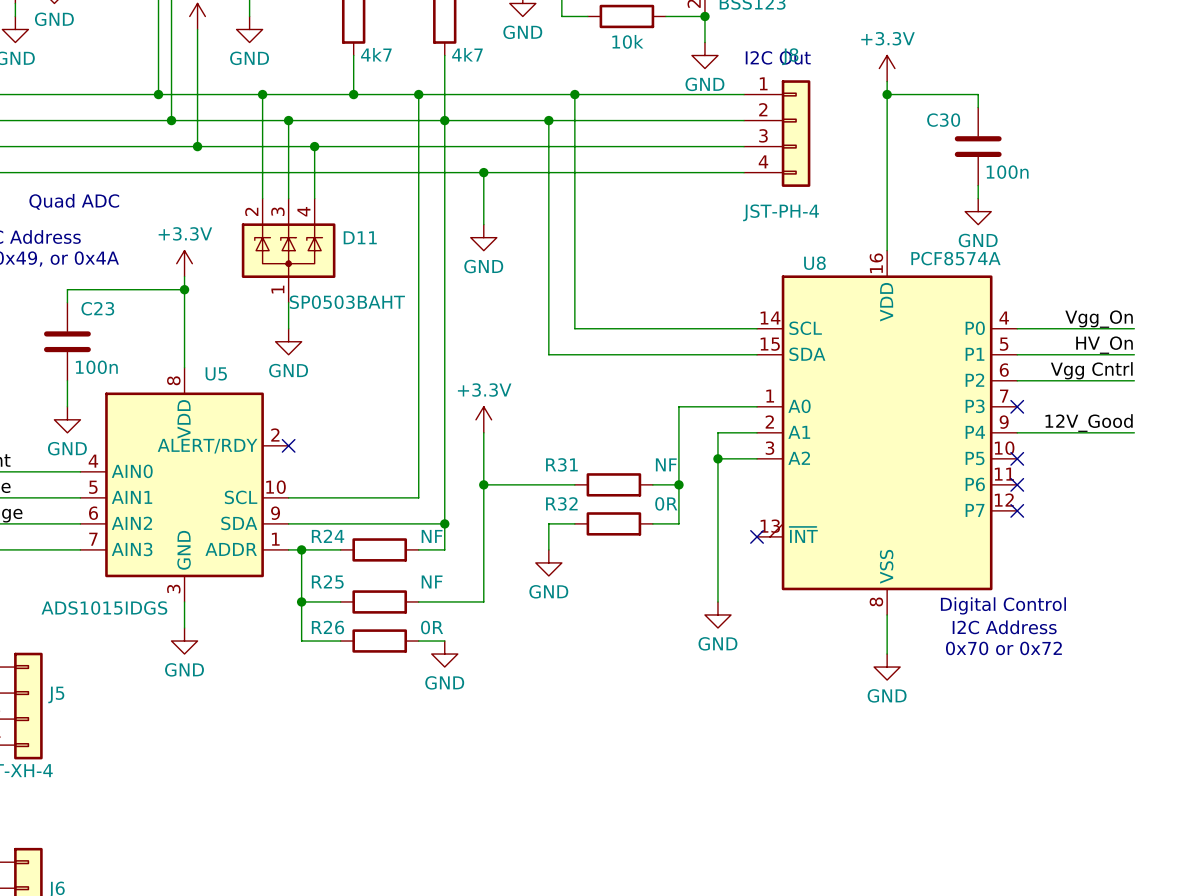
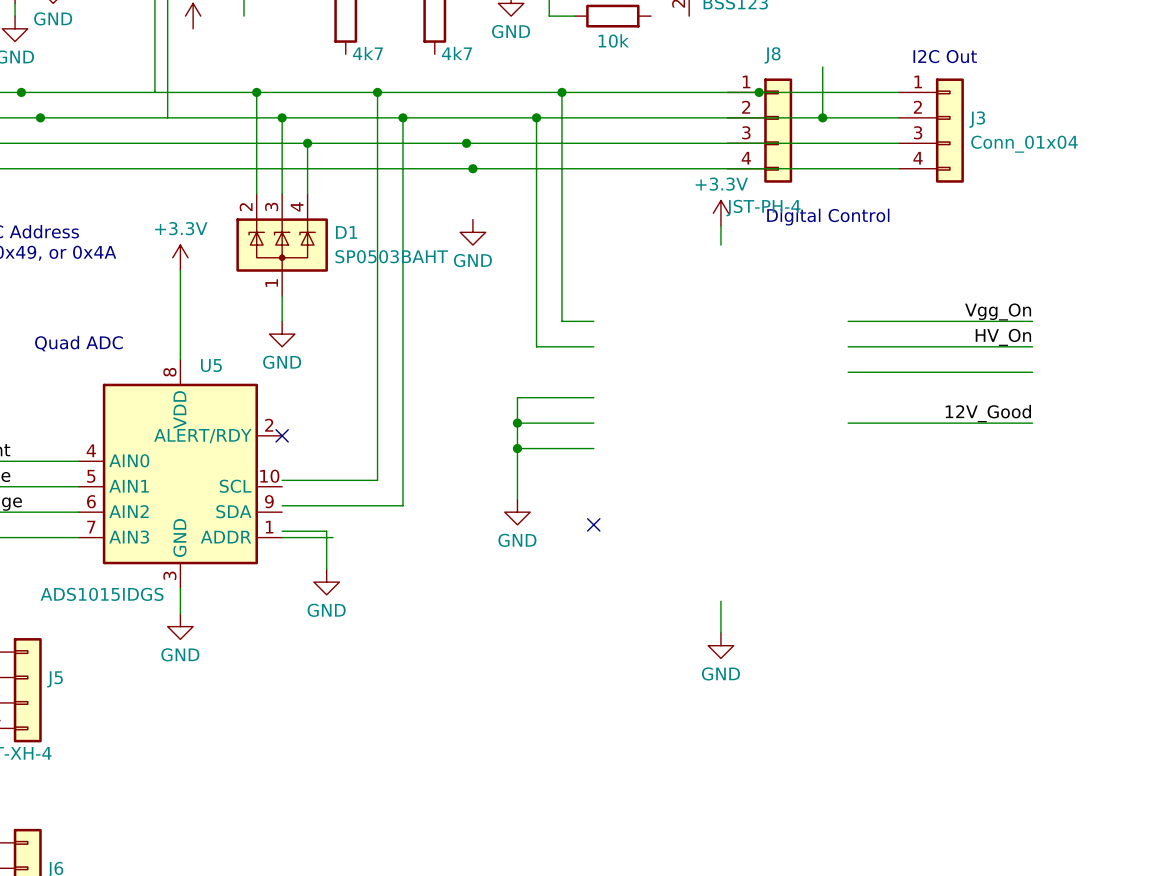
wire: (665, 16) (704, 16) (704, 42) -> none
junction: (704, 16) -> none
wire: (197, 29) (197, 146) -> none
power symbol: GND (249, 29) -> none
wire: (353, 55) (353, 94) -> none
wire: (444, 55) (444, 549) (418, 549) -> none
power symbol: GND (704, 55) -> none
text position: I2C Out (778, 57) -> I2C Out (945, 56)
wire: none -> (822, 66) (822, 117)
power symbol: +3.3V (887, 68) -> none
wire: (887, 81) (887, 250) -> none
junction: none -> (21, 92)
junction: (158, 94) -> none
junction: (353, 94) -> none
wire: none -> (377, 92) (377, 480) (282, 480)
junction: none -> (377, 92)
wire: (418, 94) (418, 497) (288, 497) -> none
junction: (418, 94) -> none
wire: none -> (727, 92) (867, 92)
junction: none -> (759, 92)
junction position: (887, 94) -> (822, 117)
junction: none -> (40, 117)
junction: (171, 120) -> none
wire: none -> (402, 117) (402, 505) (282, 505)
junction: none -> (402, 117)
junction: (444, 120) -> none
wire: none -> (727, 117) (899, 117)
J3: none -> Conn_01x04 (931, 130)
junction: (197, 146) -> none
junction: none -> (466, 143)
wire: none -> (727, 143) (899, 143)
C30: 100n (978, 146) -> none
wire: (483, 172) (483, 224) -> none
wire: none -> (727, 168) (899, 168)
wire: (978, 185) (978, 198) -> none
text position: Quad ADC (74, 201) -> Quad ADC (78, 343)
power symbol: GND (978, 211) -> none
power symbol: none -> +3.3V (720, 213)
text: none -> Digital Control (828, 217)
wire: none -> (720, 225) (720, 245)
D11 name: D11 (360, 237) -> D1 (346, 232)
wire: (184, 289) (67, 289) (67, 302) -> none
junction: (184, 289) -> none
D11 value position: SP0503BAHT (347, 302) -> SP0503BAHT (391, 256)
label position: Vgg_On (1099, 319) -> Vgg_On (998, 311)
wire: (607, 328) (757, 328) -> none
wire: (1056, 328) (1134, 328) -> none
C23: 100n (67, 341) -> none
label position: HV_On (1104, 345) -> HV_On (1003, 337)
wire: (607, 354) (757, 354) -> none
wire: (1056, 354) (1134, 354) -> none
label: Vgg Cntrl (1091, 370) -> none
wire: (67, 380) (67, 406) -> none
wire: (1056, 380) (1134, 380) -> none
wire: none -> (593, 397) (517, 397) (517, 499)
wire: (757, 406) (678, 406) (678, 523) (652, 523) -> none
no-connect mark: (1017, 406) -> none
power symbol: GND (67, 419) -> none
power symbol: +3.3V (483, 419) -> none
label position: 12V_Good (1089, 423) -> 12V_Good (988, 413)
wire: (483, 432) (483, 601) (418, 601) -> none
wire: none -> (517, 423) (593, 423)
junction: none -> (517, 423)
wire: (757, 432) (717, 432) (717, 601) -> none
U8: PCF8574A (887, 432) -> none
wire: (1056, 432) (1134, 432) -> none
wire: none -> (517, 448) (593, 448)
junction: none -> (517, 448)
wire: (717, 458) (757, 458) -> none
junction: (717, 458) -> none
no-connect mark: (1017, 458) -> none
wire: (483, 484) (574, 484) -> none
junction: (483, 484) -> none
R31: NF (613, 484) -> none
wire: (652, 484) (678, 484) -> none
junction: (678, 484) -> none
no-connect mark: (1017, 484) -> none
no-connect mark: (1017, 510) -> none
wire: (288, 523) (444, 523) -> none
junction: (444, 523) -> none
wire: (574, 523) (548, 523) (548, 549) -> none
R32: 0R (613, 523) -> none
no-connect mark: none -> (593, 524)
no-connect mark: (757, 536) -> none
wire: none -> (282, 531) (326, 531) (326, 569)
wire: (301, 549) (301, 641) (340, 641) -> none
junction: (301, 549) -> none
R24: NF (379, 549) -> none
power symbol position: GND (548, 562) -> GND (517, 512)
power symbol: none -> GND (326, 582)
wire: (301, 601) (340, 601) -> none
junction: (301, 601) -> none
R25: NF (379, 601) -> none
text: Digital Control (1003, 605) -> none
power symbol position: GND (717, 614) -> GND (720, 645)
wire: none -> (720, 601) (720, 632)
wire: (887, 614) (887, 654) -> none
text: I2C Address (1004, 627) -> none
R26: 0R (379, 641) -> none
wire: (418, 641) (444, 641) -> none
text: 0x70 or 0x72 (1003, 648) -> none
power symbol: GND (444, 654) -> none
power symbol: GND (887, 667) -> none

